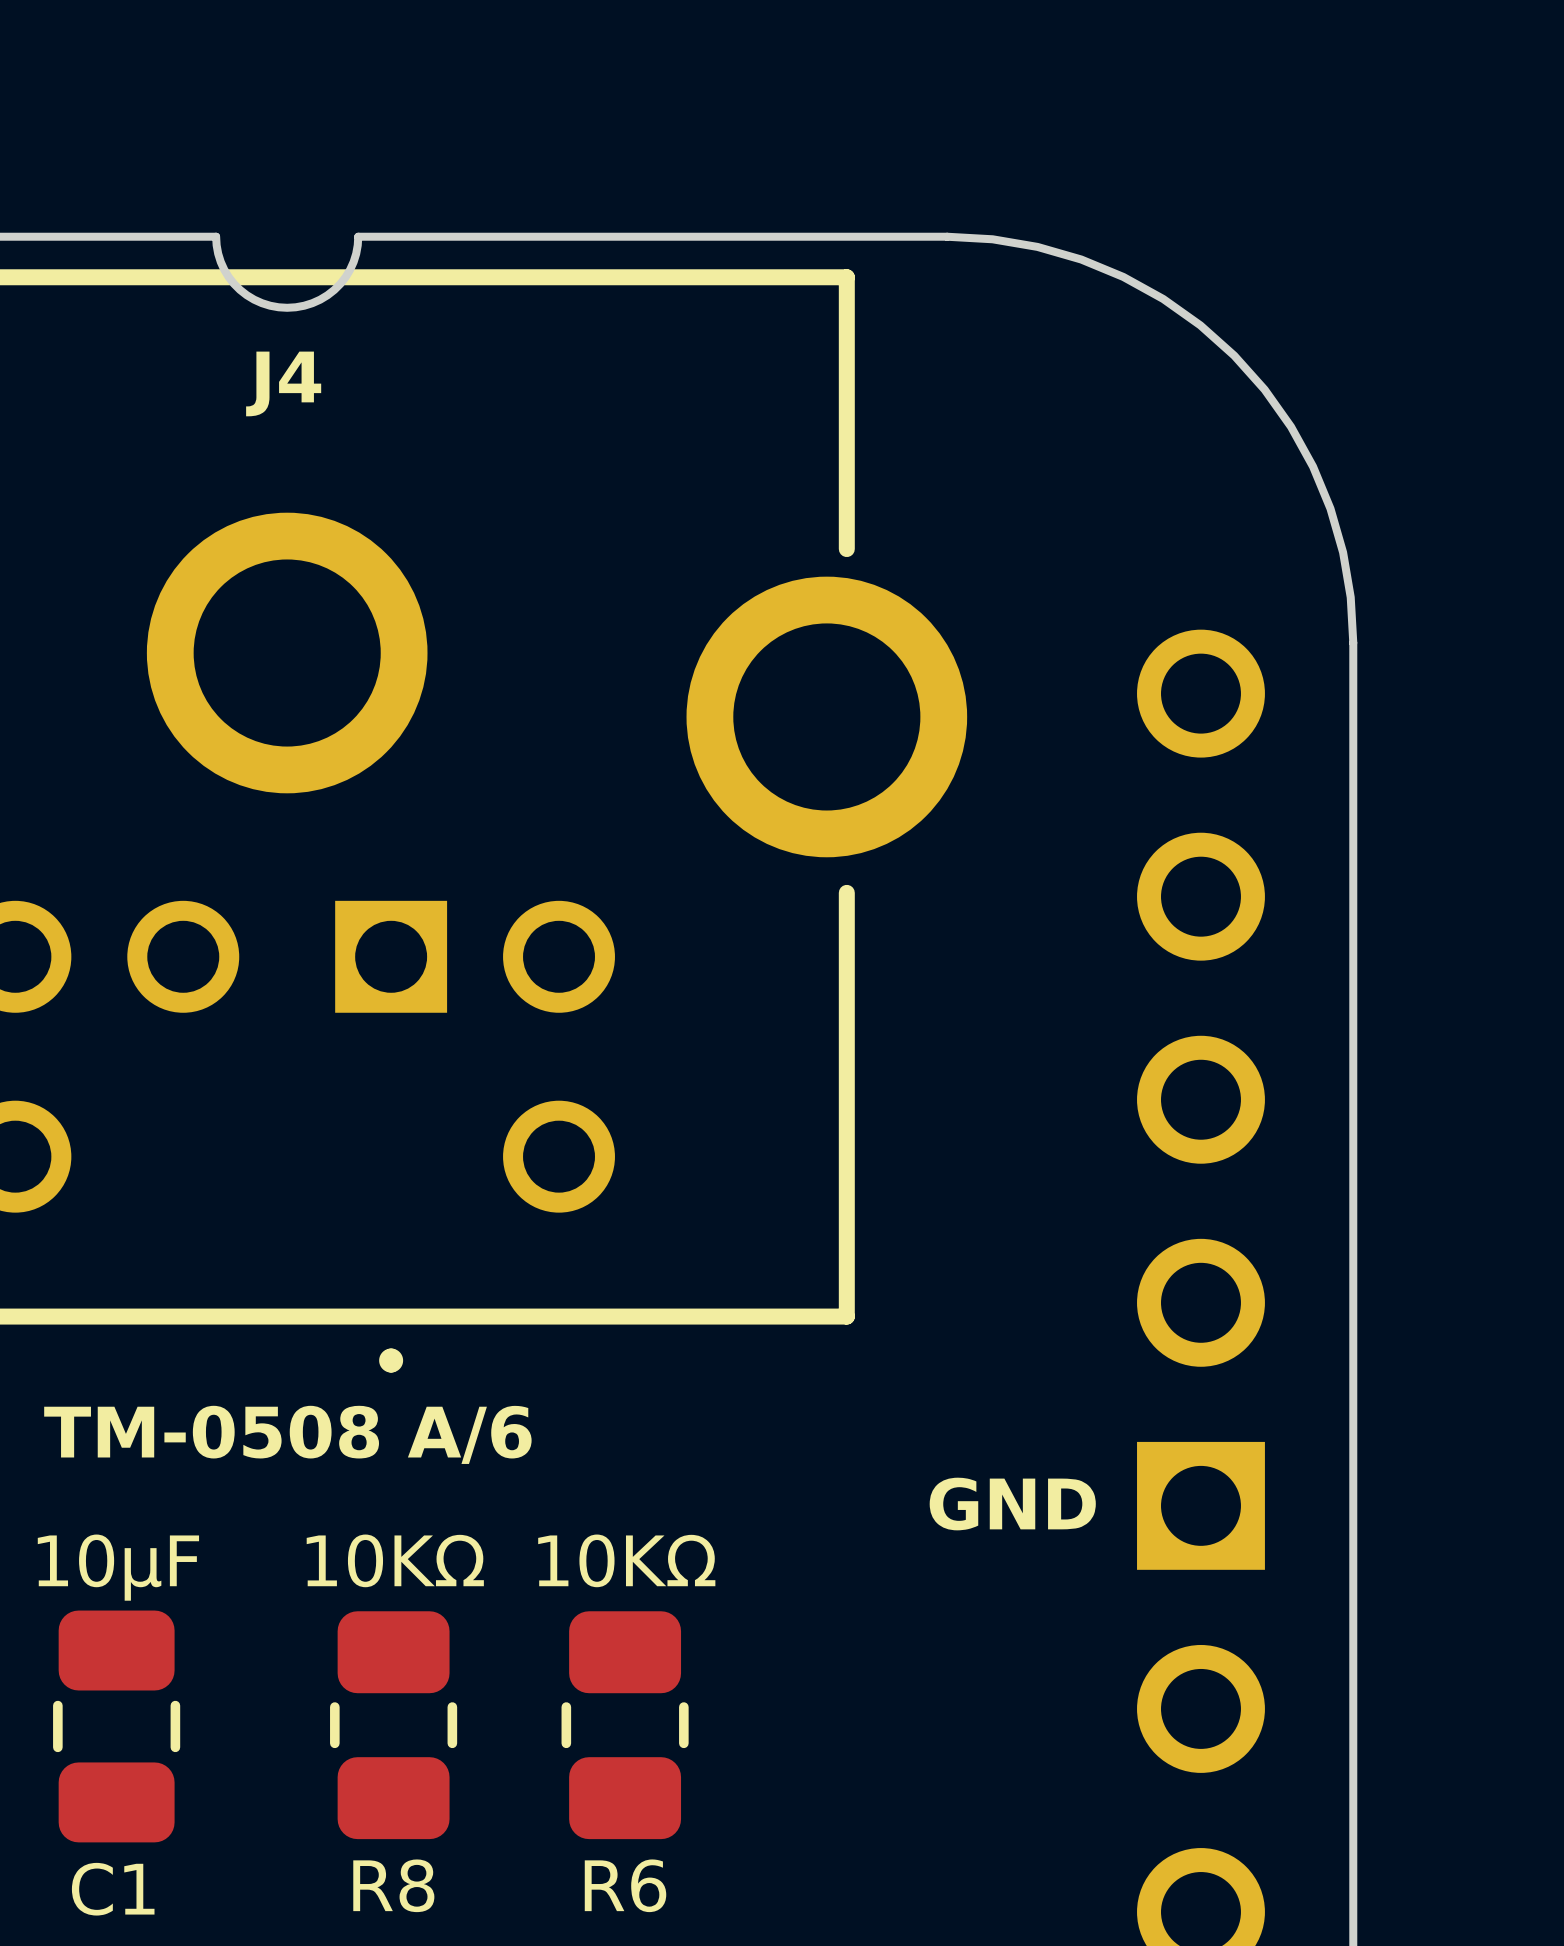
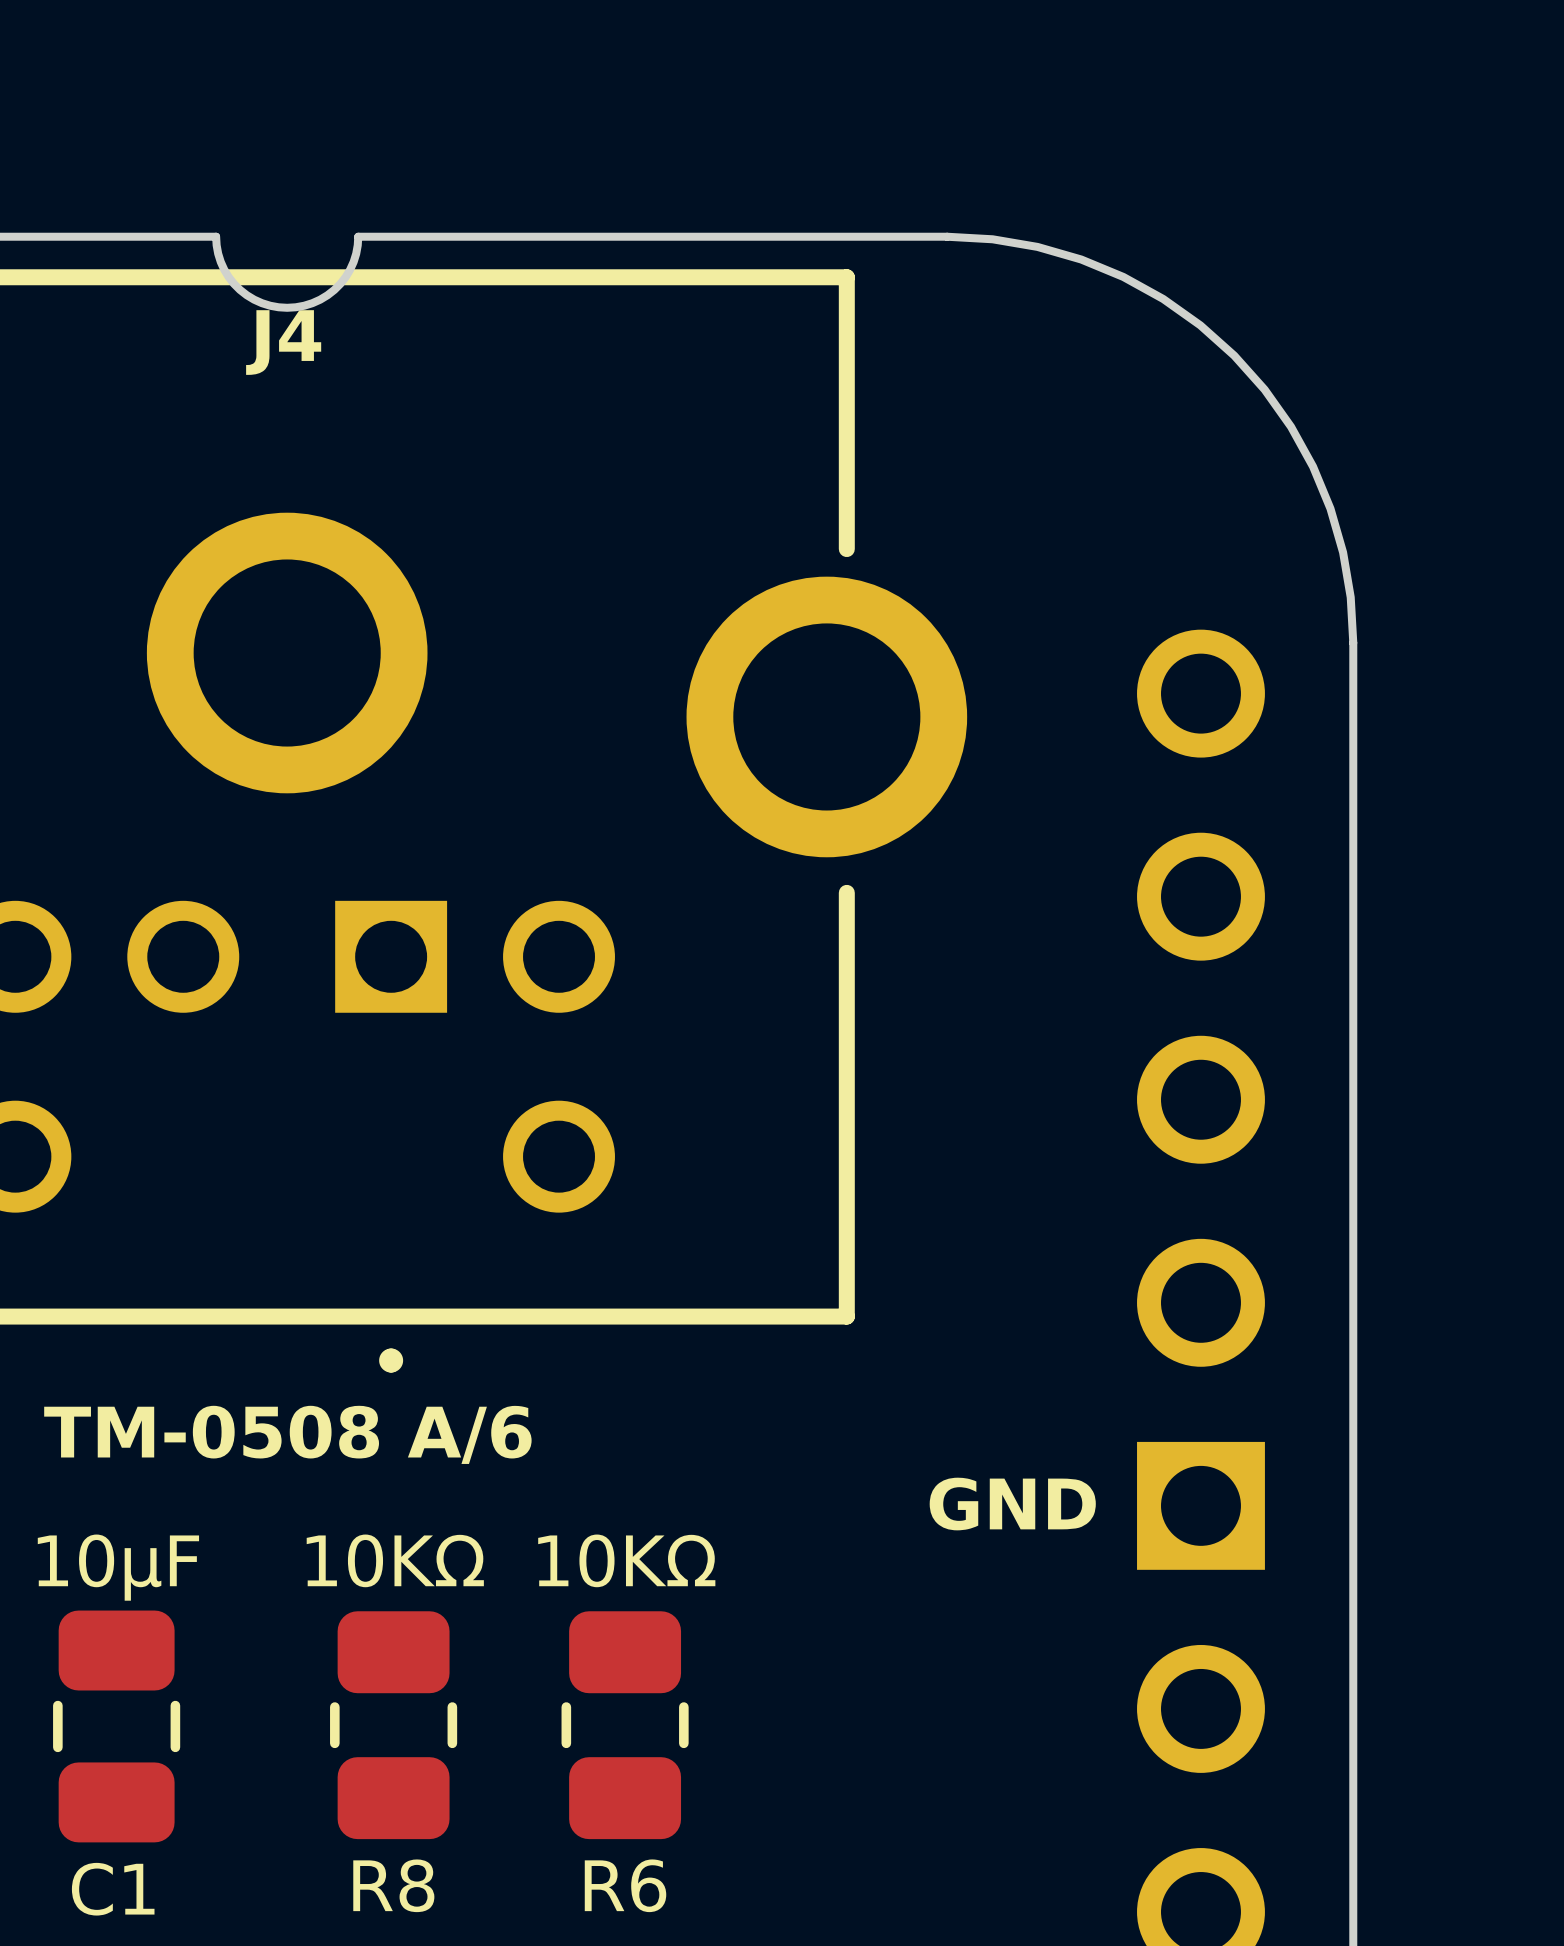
J4 name position: J4 (283, 383) -> J4 (283, 342)

